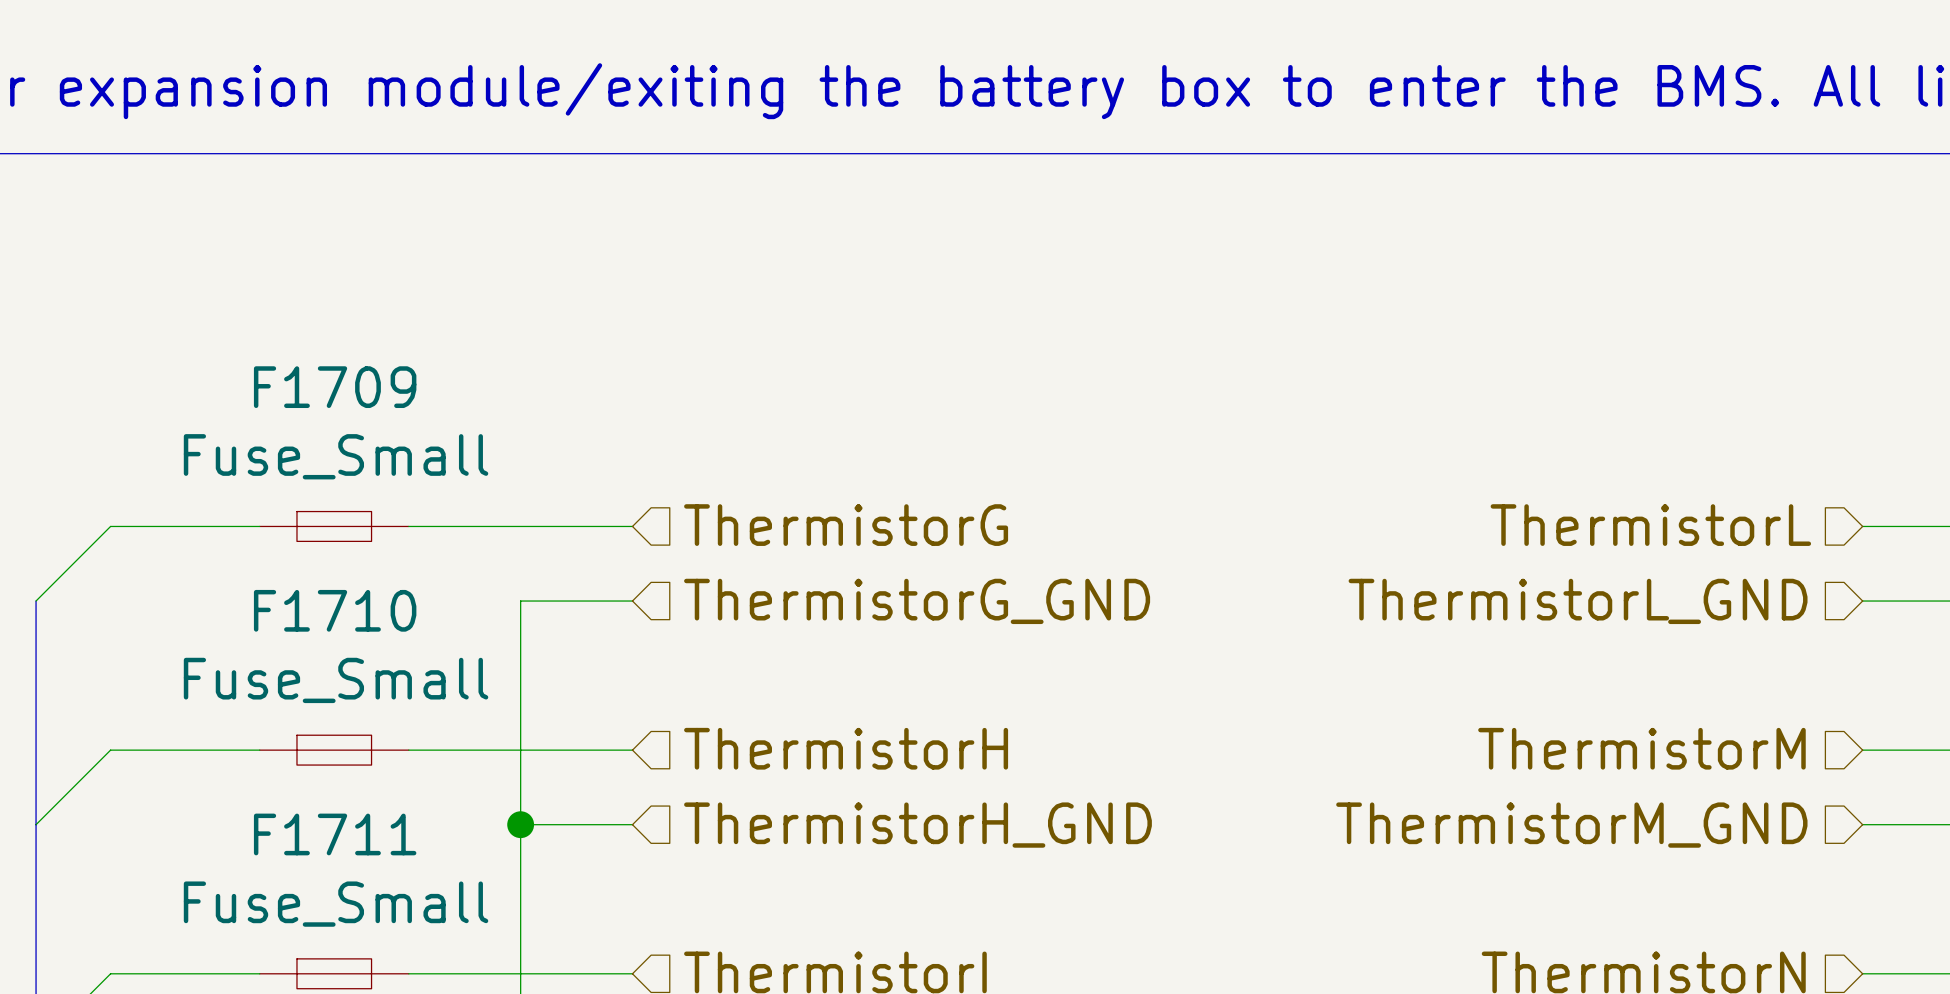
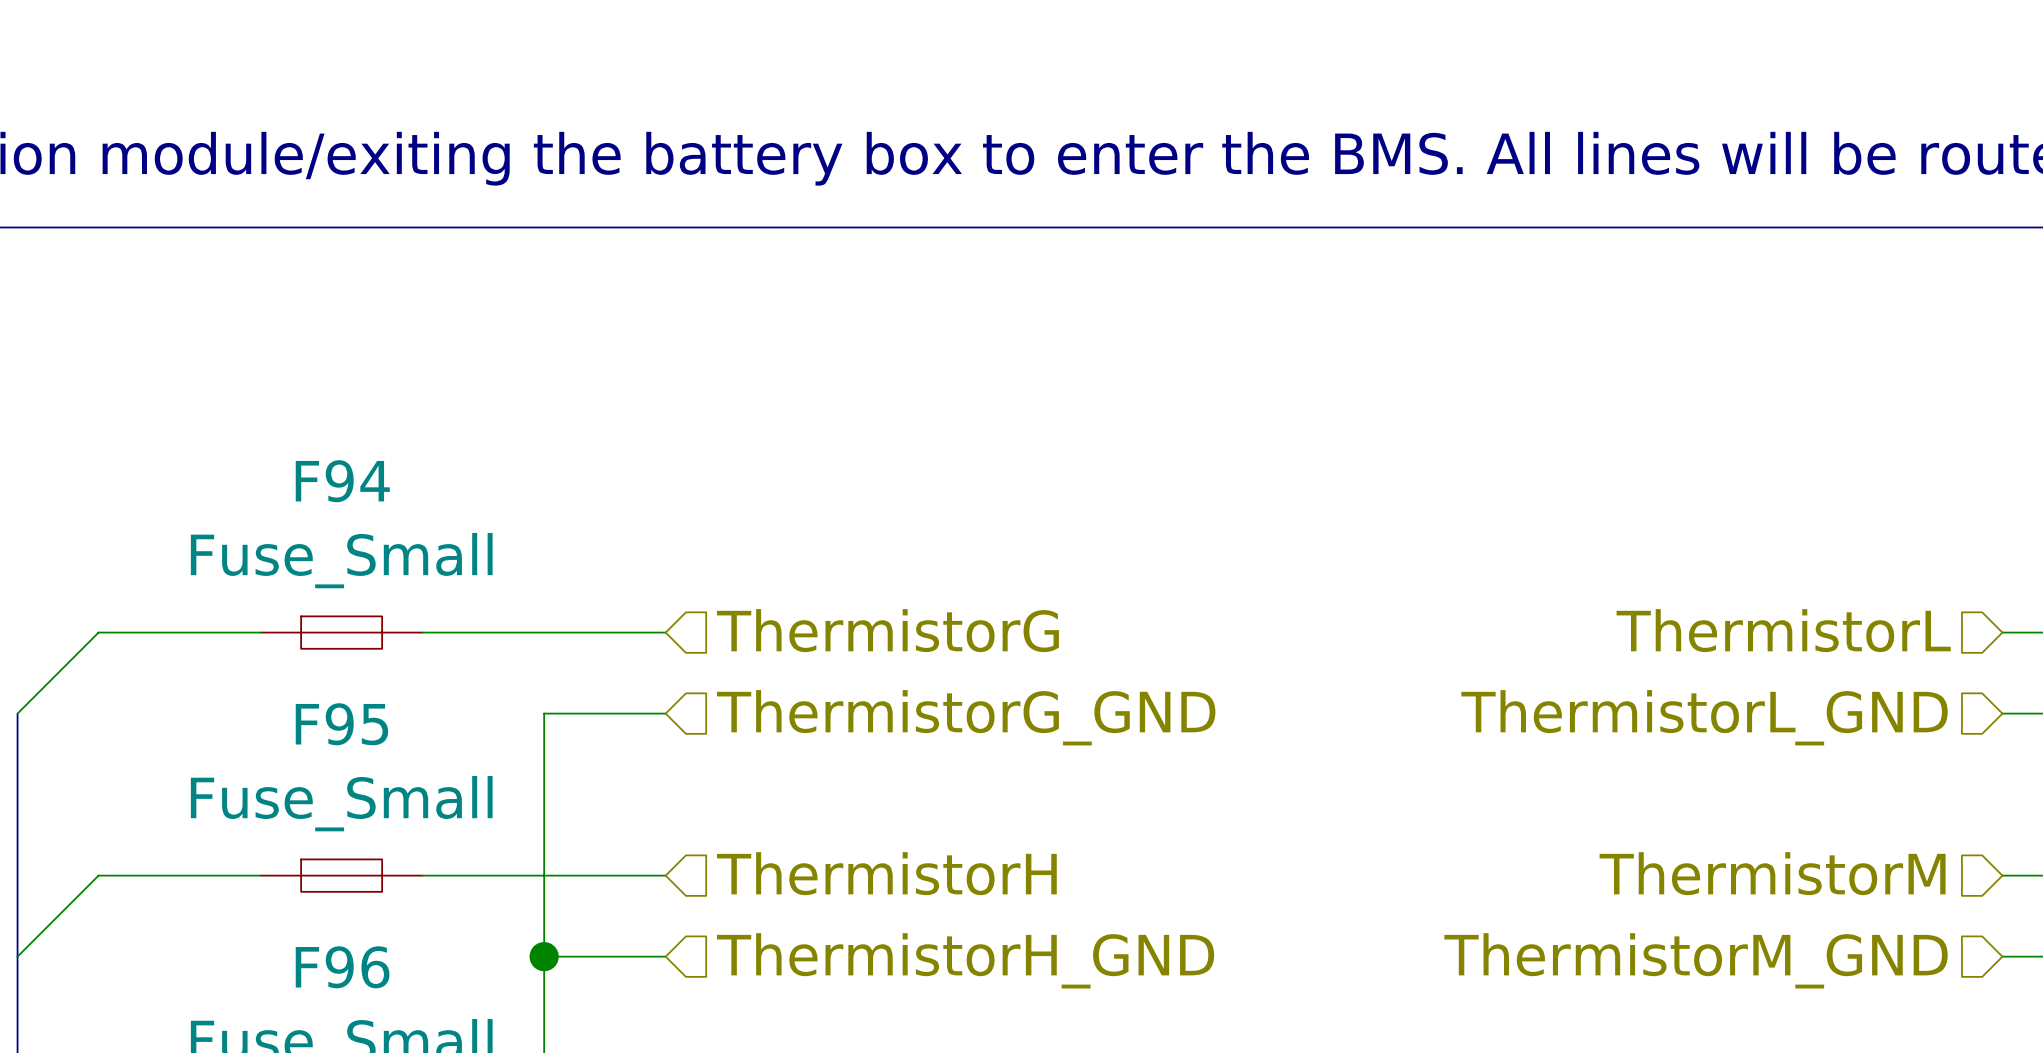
F1709 name: F1709 (335, 387) -> F94 (342, 481)
F1710 name: F1710 (335, 610) -> F95 (341, 724)
F1711 name: F1711 (335, 834) -> F96 (342, 967)

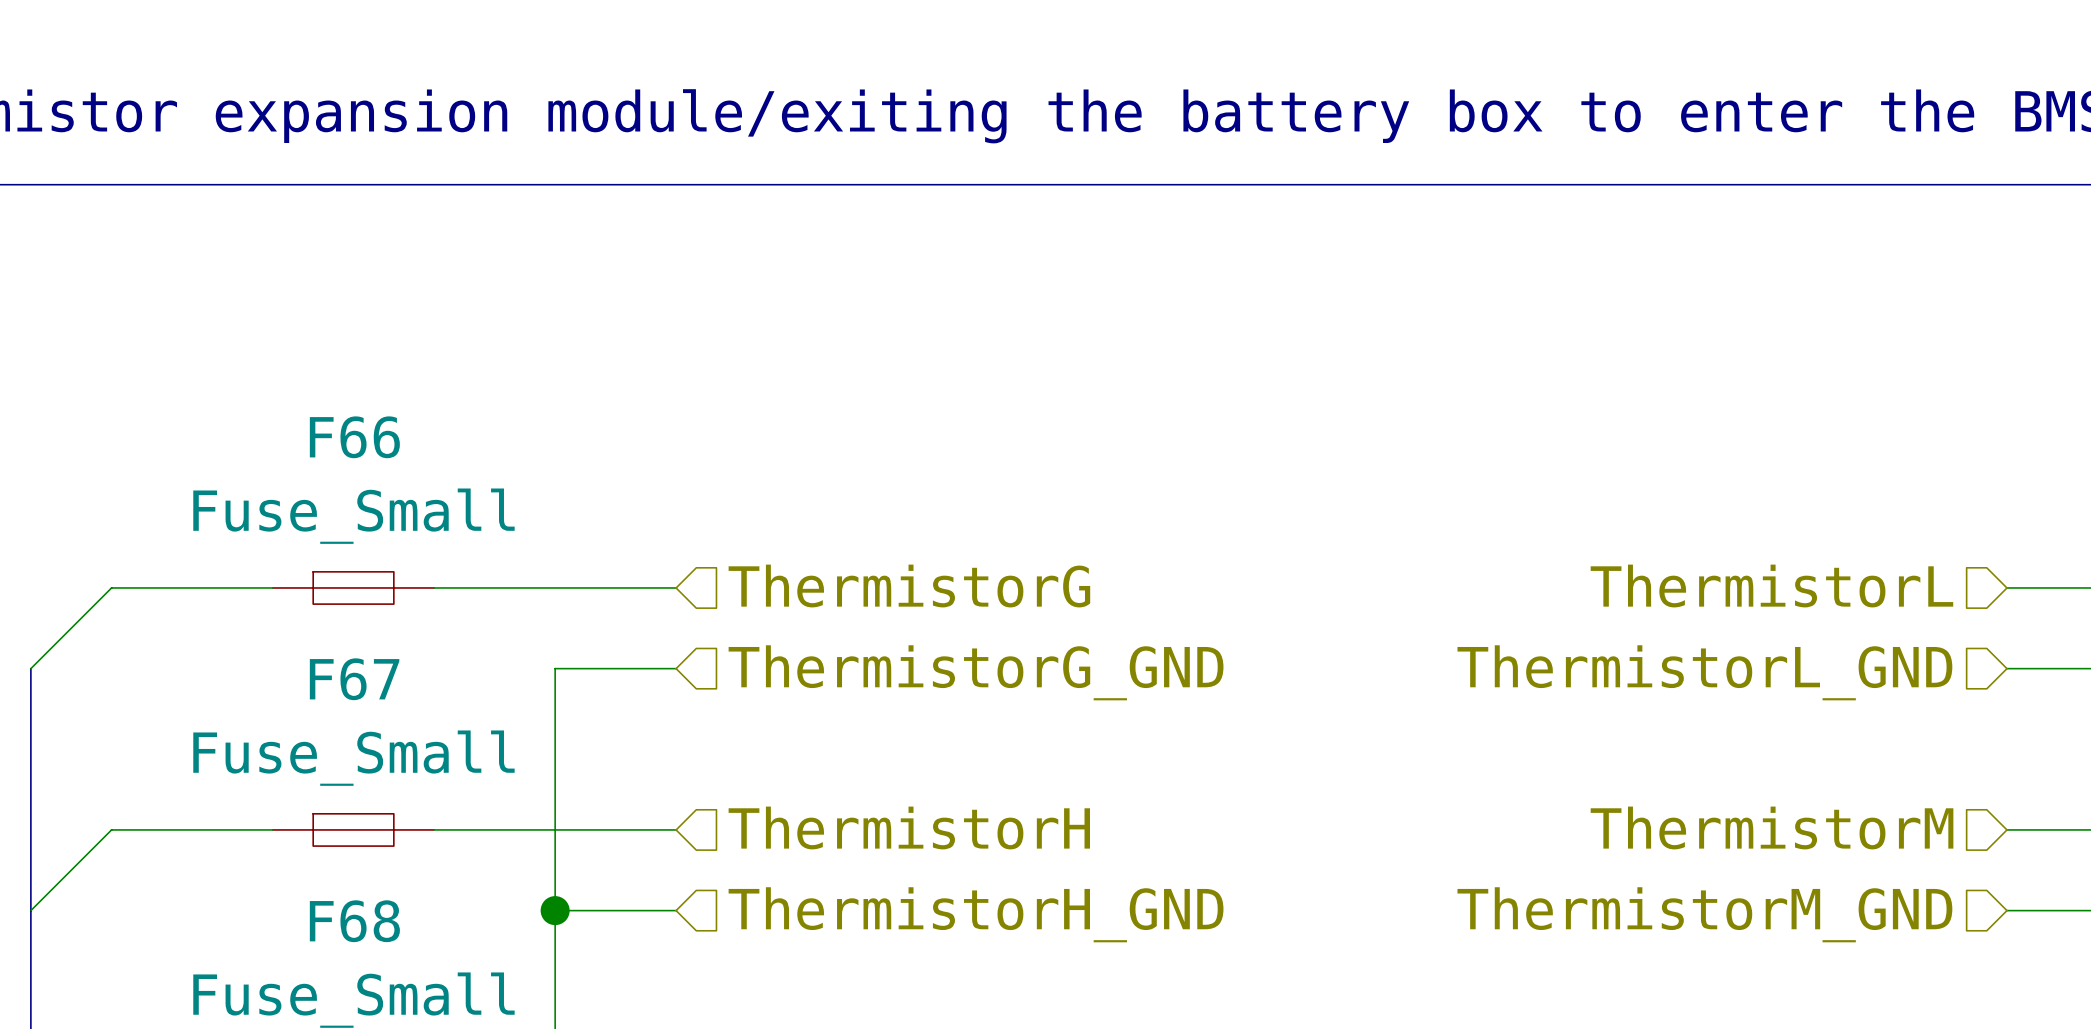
F94 name: F94 (342, 481) -> F66 (354, 437)
F95 name: F95 (341, 724) -> F67 (354, 679)
F96 name: F96 (342, 967) -> F68 (354, 921)

